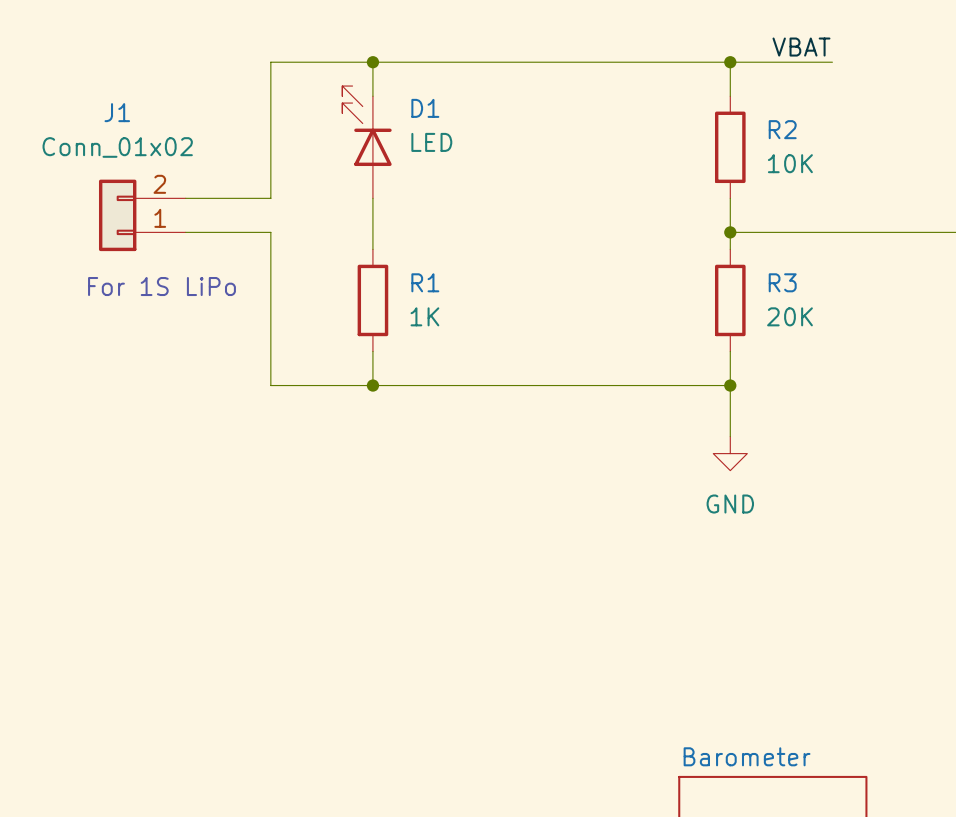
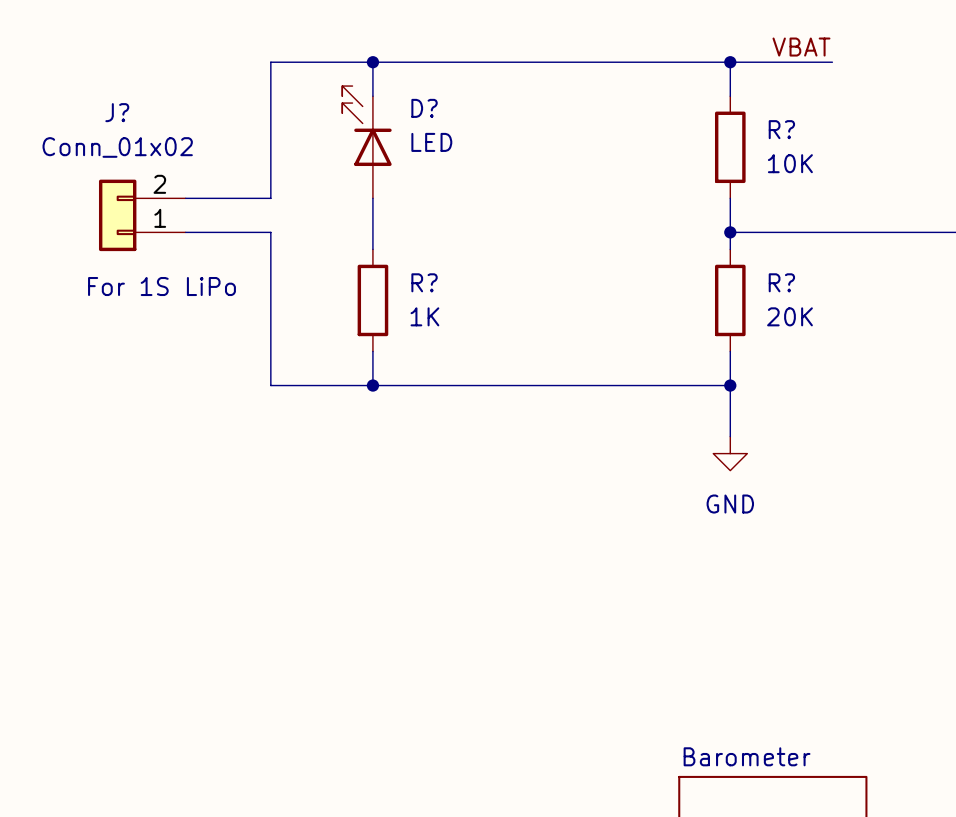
D1 name: D1 (425, 108) -> D? (424, 108)
J1 name: J1 (117, 112) -> J? (117, 112)
R2 name: R2 (782, 129) -> R? (781, 129)
R1 name: R1 (425, 282) -> R? (424, 282)
R3 name: R3 (782, 282) -> R? (781, 282)

